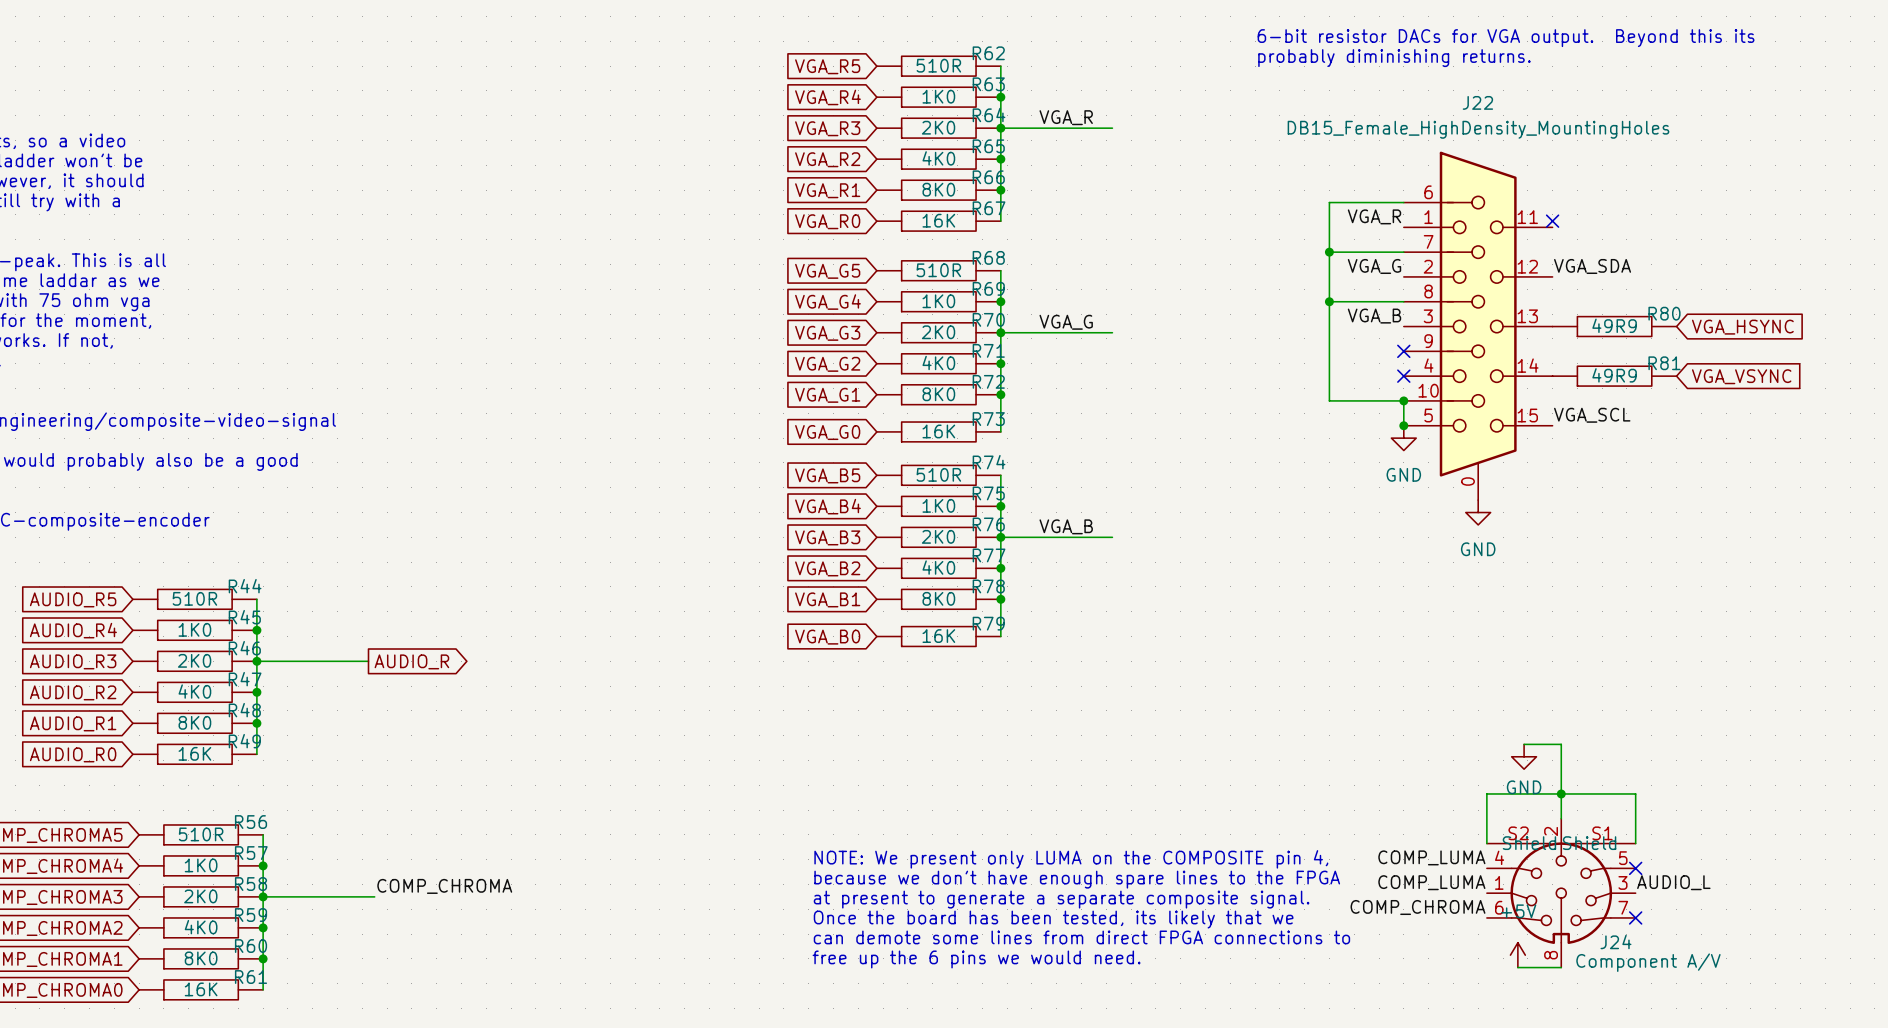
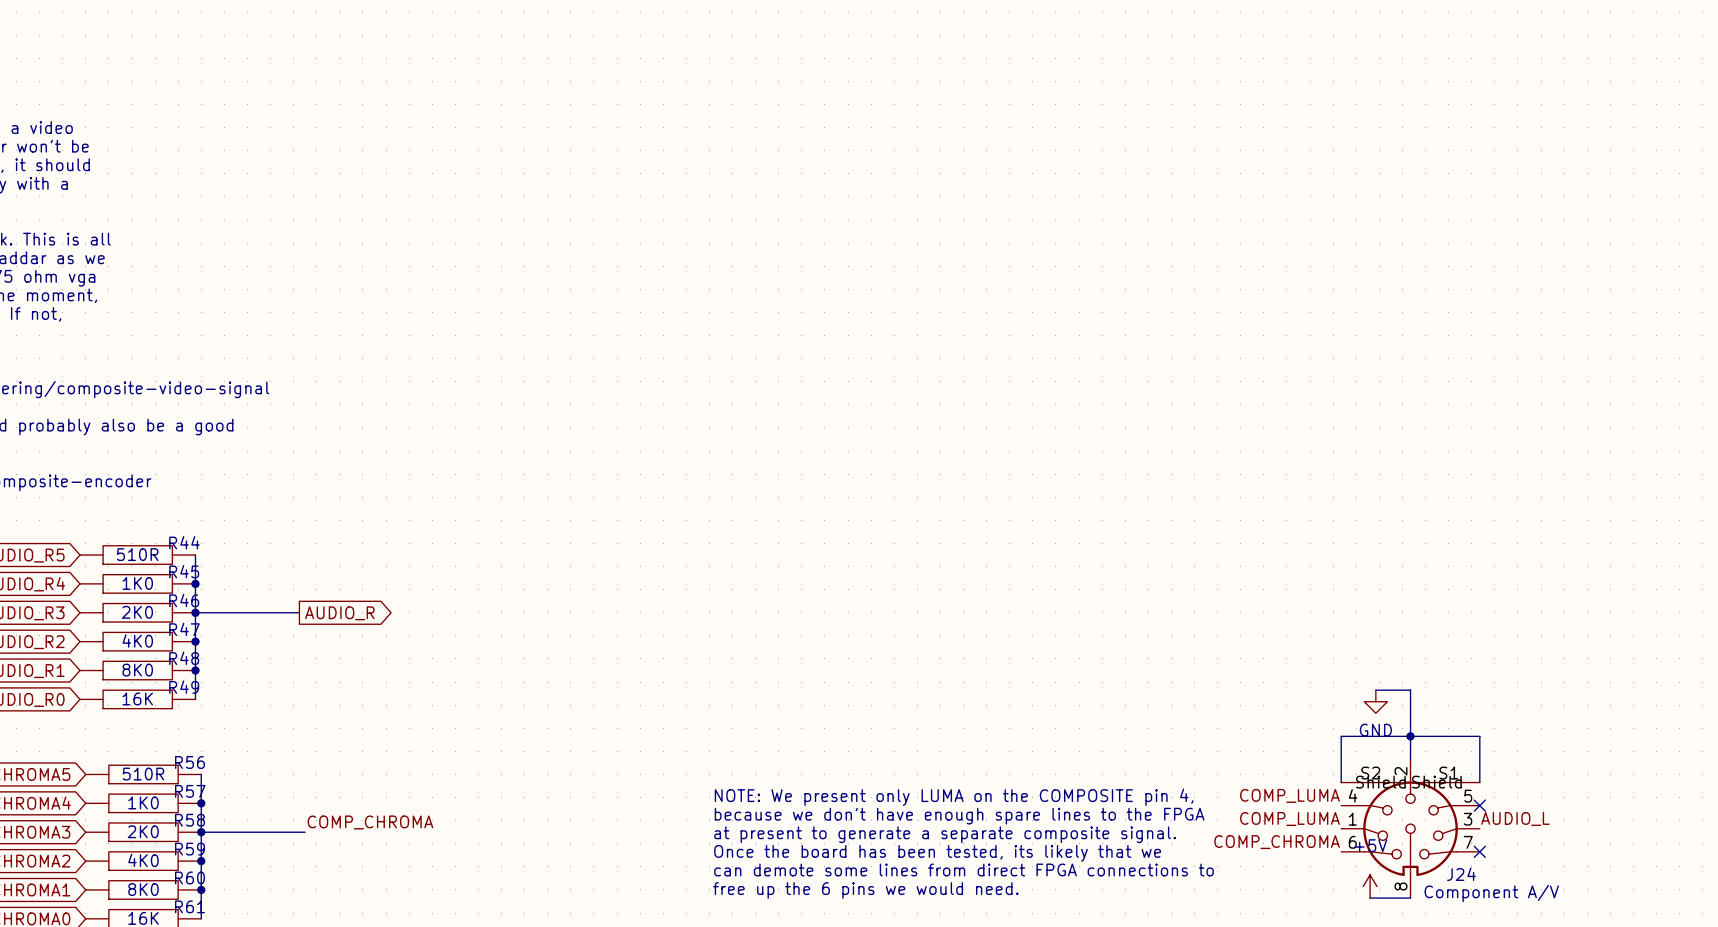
text: 6-bit resistor DACs for VGA output. Beyond this its (1506, 38) -> none
text: probably diminishing returns. (1394, 58) -> none
global label: VGA_R5 (827, 66) -> none
R62: 510R (938, 66) -> none
wire: (1000, 66) (1000, 221) -> none
global label: VGA_R4 (827, 97) -> none
R63: 1K0 (938, 97) -> none
junction: (1000, 97) -> none
label: VGA_R (1066, 117) -> none
global label: VGA_R3 (827, 128) -> none
R64: 2K0 (938, 128) -> none
wire: (1000, 128) (1112, 128) -> none
junction: (1000, 128) -> none
global label: VGA_R2 (827, 159) -> none
R65: 4K0 (938, 159) -> none
junction: (1000, 159) -> none
global label: VGA_R1 (827, 190) -> none
R66: 8K0 (938, 190) -> none
junction: (1000, 190) -> none
wire: (1403, 202) (1329, 202) (1329, 400) (1403, 400) (1403, 425) -> none
label: VGA_R (1374, 216) -> none
global label: VGA_R0 (827, 221) -> none
R67: 16K (938, 221) -> none
no-connect mark: (1552, 221) -> none
wire: (1329, 252) (1403, 252) -> none
junction: (1329, 252) -> none
label: VGA_G (1374, 266) -> none
label: VGA_SDA (1592, 266) -> none
R68: 510R (938, 270) -> none
wire: (1000, 270) (1000, 431) -> none
global label: VGA_G5 (827, 271) -> none
R69: 1K0 (938, 301) -> none
junction: (1000, 301) -> none
wire: (1329, 301) (1403, 301) -> none
junction: (1329, 301) -> none
global label: VGA_G4 (827, 302) -> none
label: VGA_B (1374, 316) -> none
label: VGA_G (1066, 322) -> none
J22: DB15_Female_HighDensity_MountingHoles (1478, 325) -> none
R80: 49R9 (1614, 326) -> none
global label: VGA_HSYNC (1742, 327) -> none
R70: 2K0 (938, 332) -> none
wire: (1000, 332) (1112, 332) -> none
junction: (1000, 332) -> none
global label: VGA_G3 (827, 333) -> none
no-connect mark: (1403, 351) -> none
R71: 4K0 (938, 363) -> none
junction: (1000, 363) -> none
global label: VGA_G2 (827, 364) -> none
no-connect mark: (1403, 376) -> none
R81: 49R9 (1614, 376) -> none
global label: VGA_VSYNC (1741, 376) -> none
R72: 8K0 (938, 394) -> none
junction: (1000, 394) -> none
global label: VGA_G1 (827, 395) -> none
junction: (1403, 400) -> none
label: VGA_SCL (1592, 415) -> none
junction: (1403, 425) -> none
R73: 16K (938, 431) -> none
global label: VGA_G0 (827, 432) -> none
power symbol: GND (1403, 438) -> none
global label: VGA_B5 (827, 475) -> none
R74: 510R (938, 475) -> none
wire: (1000, 475) (1000, 636) -> none
global label: VGA_B4 (827, 506) -> none
R75: 1K0 (938, 506) -> none
junction: (1000, 506) -> none
power symbol: GND (1478, 512) -> none
label: VGA_B (1066, 526) -> none
global label: VGA_B3 (827, 537) -> none
R76: 2K0 (938, 537) -> none
wire: (1000, 537) (1112, 537) -> none
junction: (1000, 537) -> none
global label: VGA_B2 (827, 568) -> none
R77: 4K0 (938, 568) -> none
junction: (1000, 568) -> none
global label: VGA_B1 (827, 599) -> none
R78: 8K0 (938, 599) -> none
junction: (1000, 599) -> none
R79: 16K (938, 636) -> none
global label: VGA_B0 (827, 637) -> none

